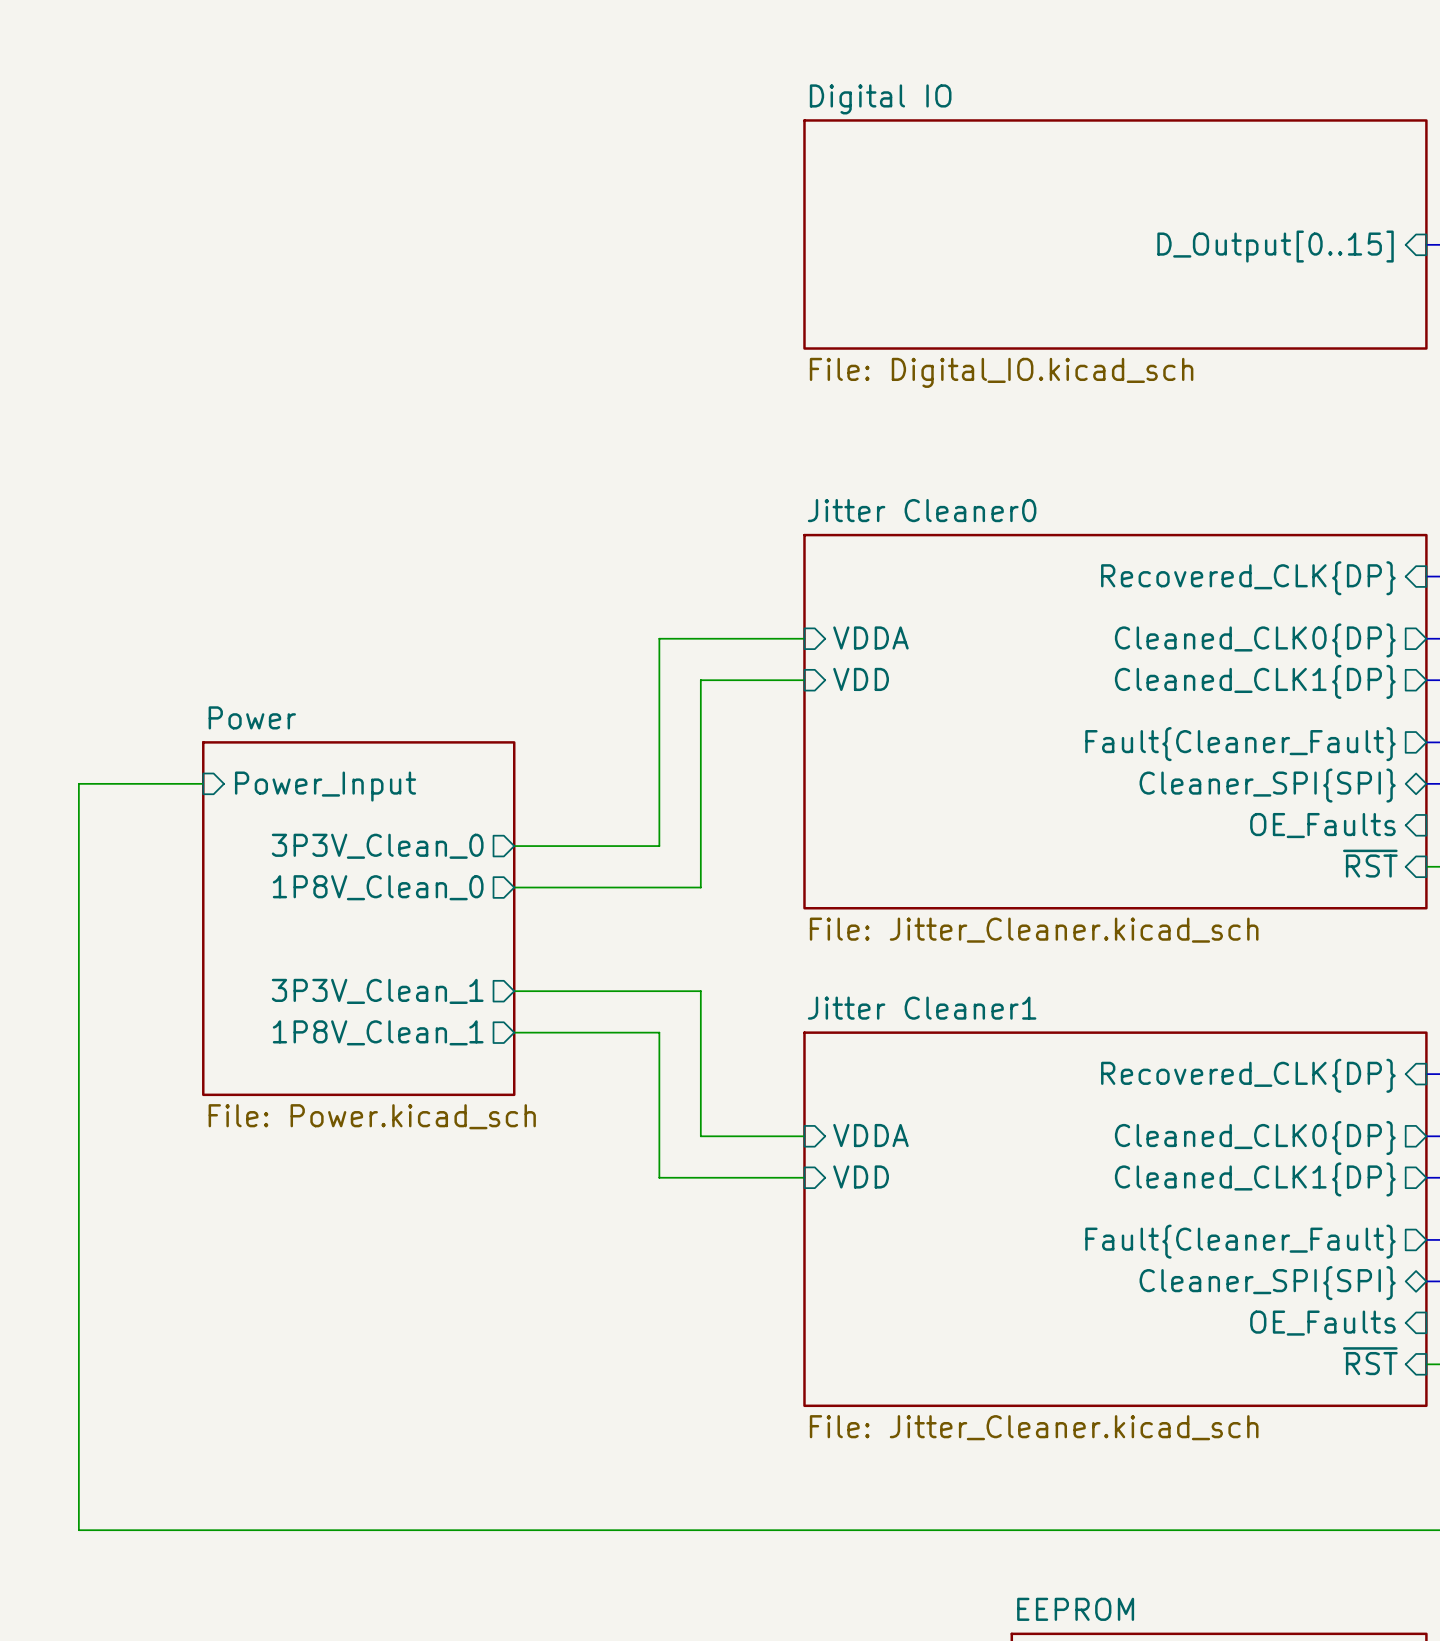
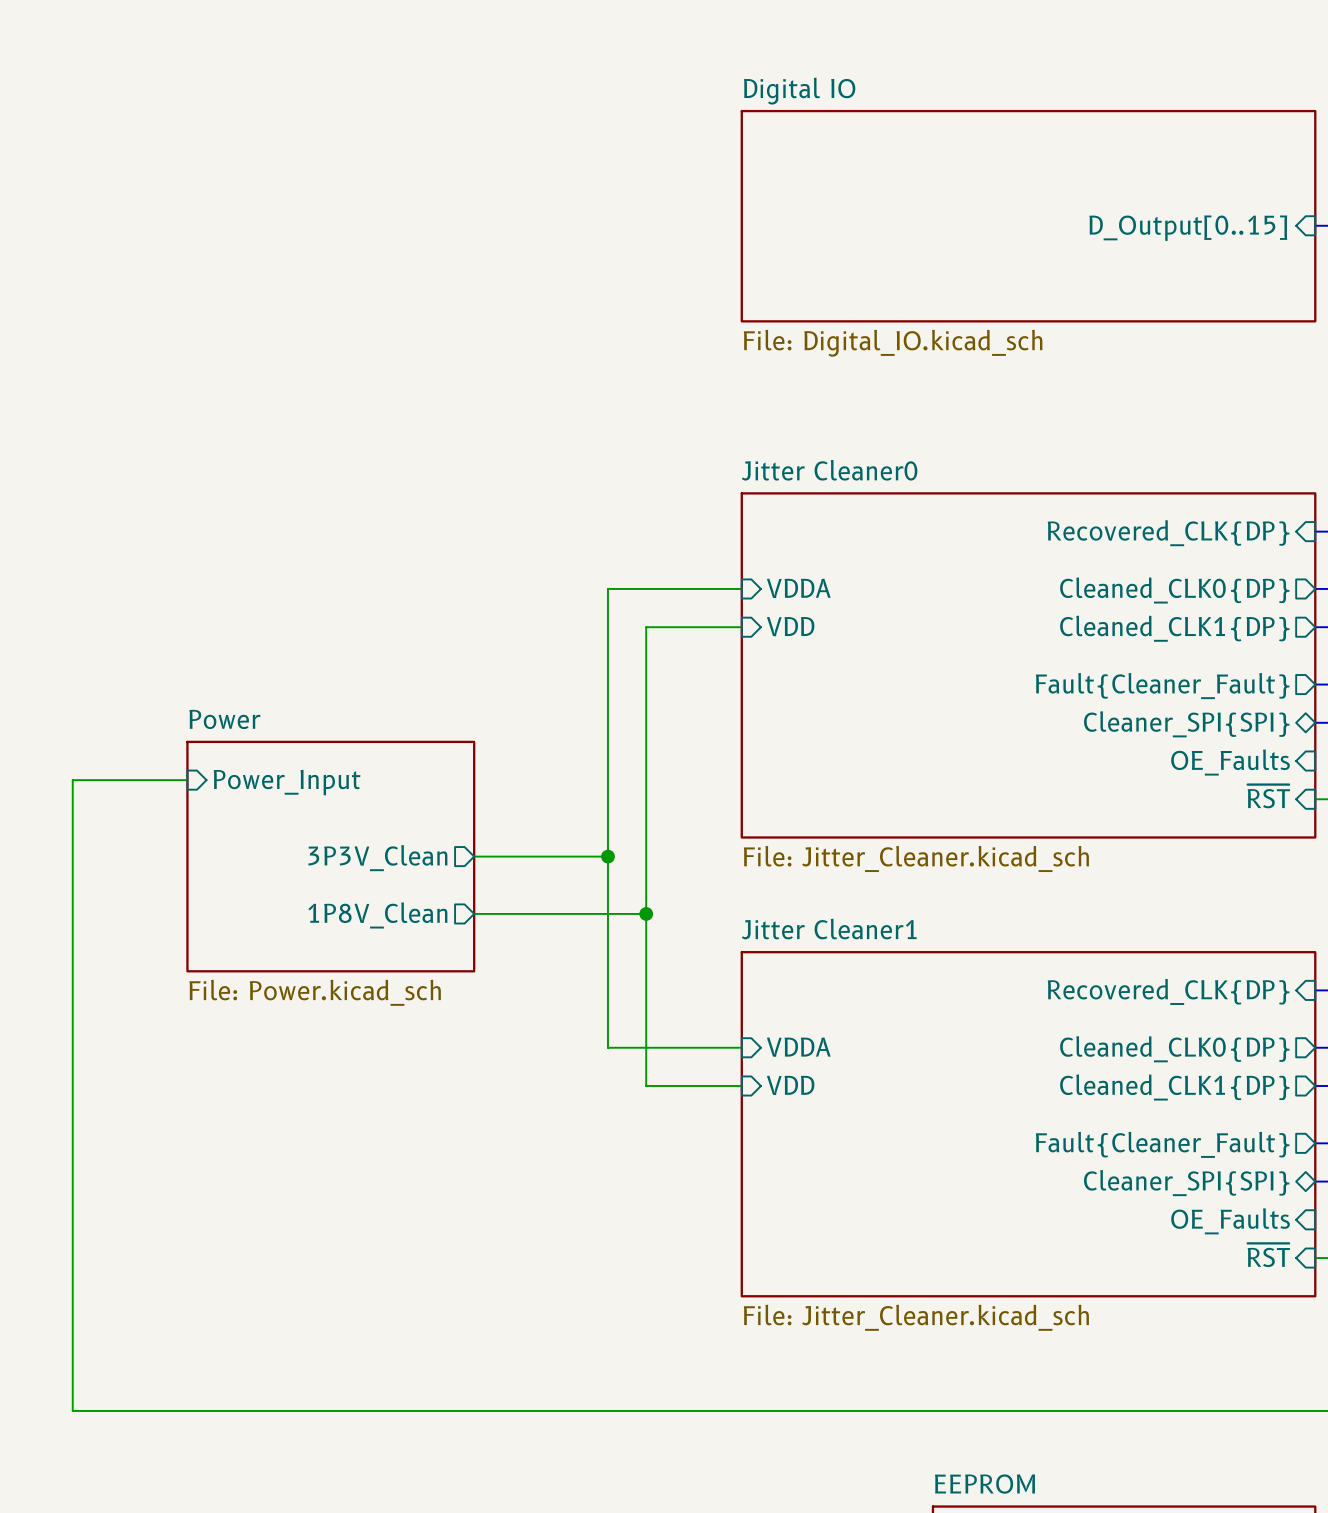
sheet Power name position: Power (252, 717) -> Power (224, 719)
sheet Power shape: [202, 741, 516, 1097] -> [186, 740, 476, 973]
wire: (203, 783) (78, 783) (78, 846) -> (187, 780) (72, 780)
sheet pin position: Power_Input (325, 786) -> Power_Input (287, 782)
sheet pin: 3P3V_Clean_0 (377, 846) -> none
wire: (514, 846) (659, 846) -> (607, 952) (607, 780)
sheet pin: 1P8V_Clean_0 (378, 887) -> 3P3V_Clean (377, 858)
wire: (514, 887) (700, 887) -> (646, 913) (646, 818)
junction: none -> (607, 856)
sheet pin: 3P3V_Clean_1 (377, 991) -> 1P8V_Clean (377, 915)
junction: none -> (646, 913)
sheet pin: 1P8V_Clean_1 (378, 1032) -> none
wire: (514, 1032) (659, 1032) -> (474, 856) (607, 856)
sheet Power value position: File: Power.kicad_sch (372, 1116) -> File: Power.kicad_sch (315, 992)
wire: (659, 1136) (659, 1177) (700, 1177) -> (607, 1047) (646, 1047) (646, 1085)

